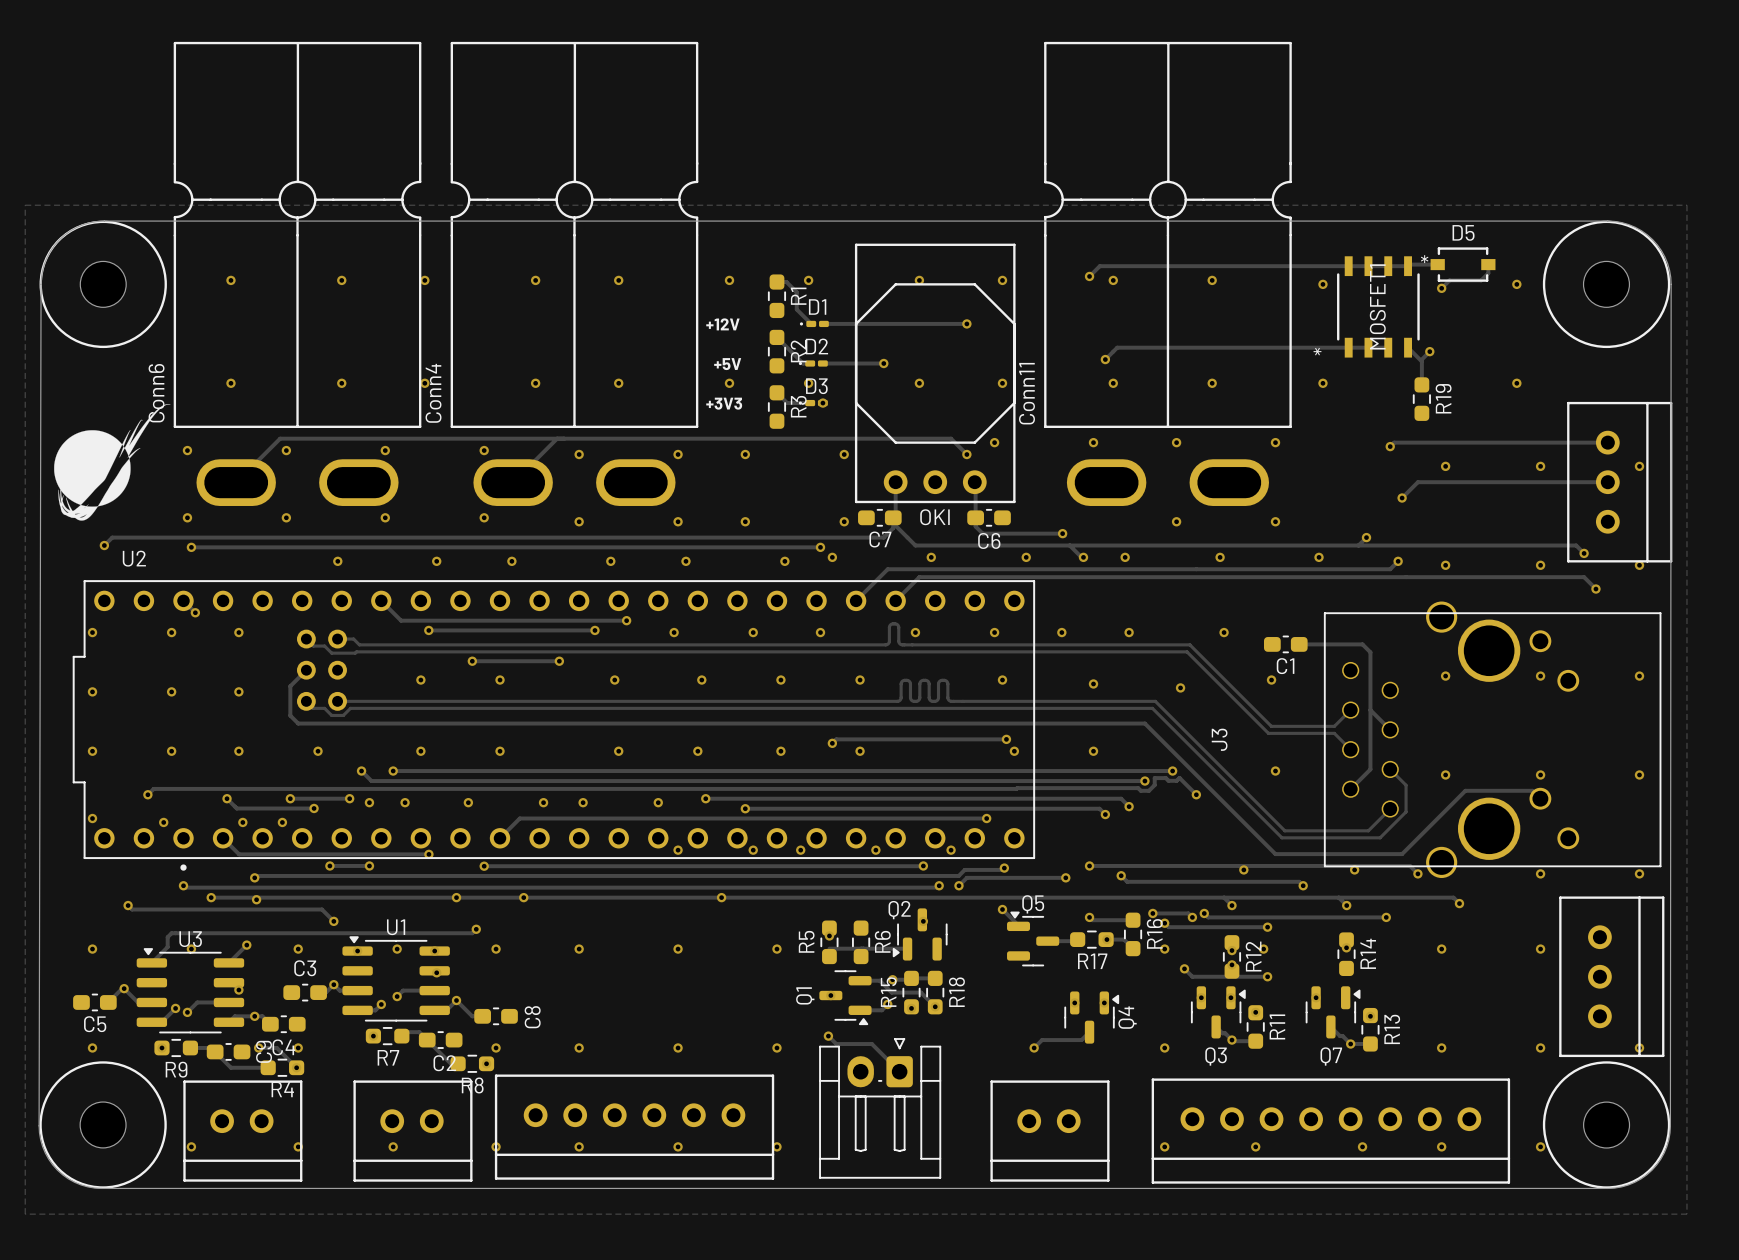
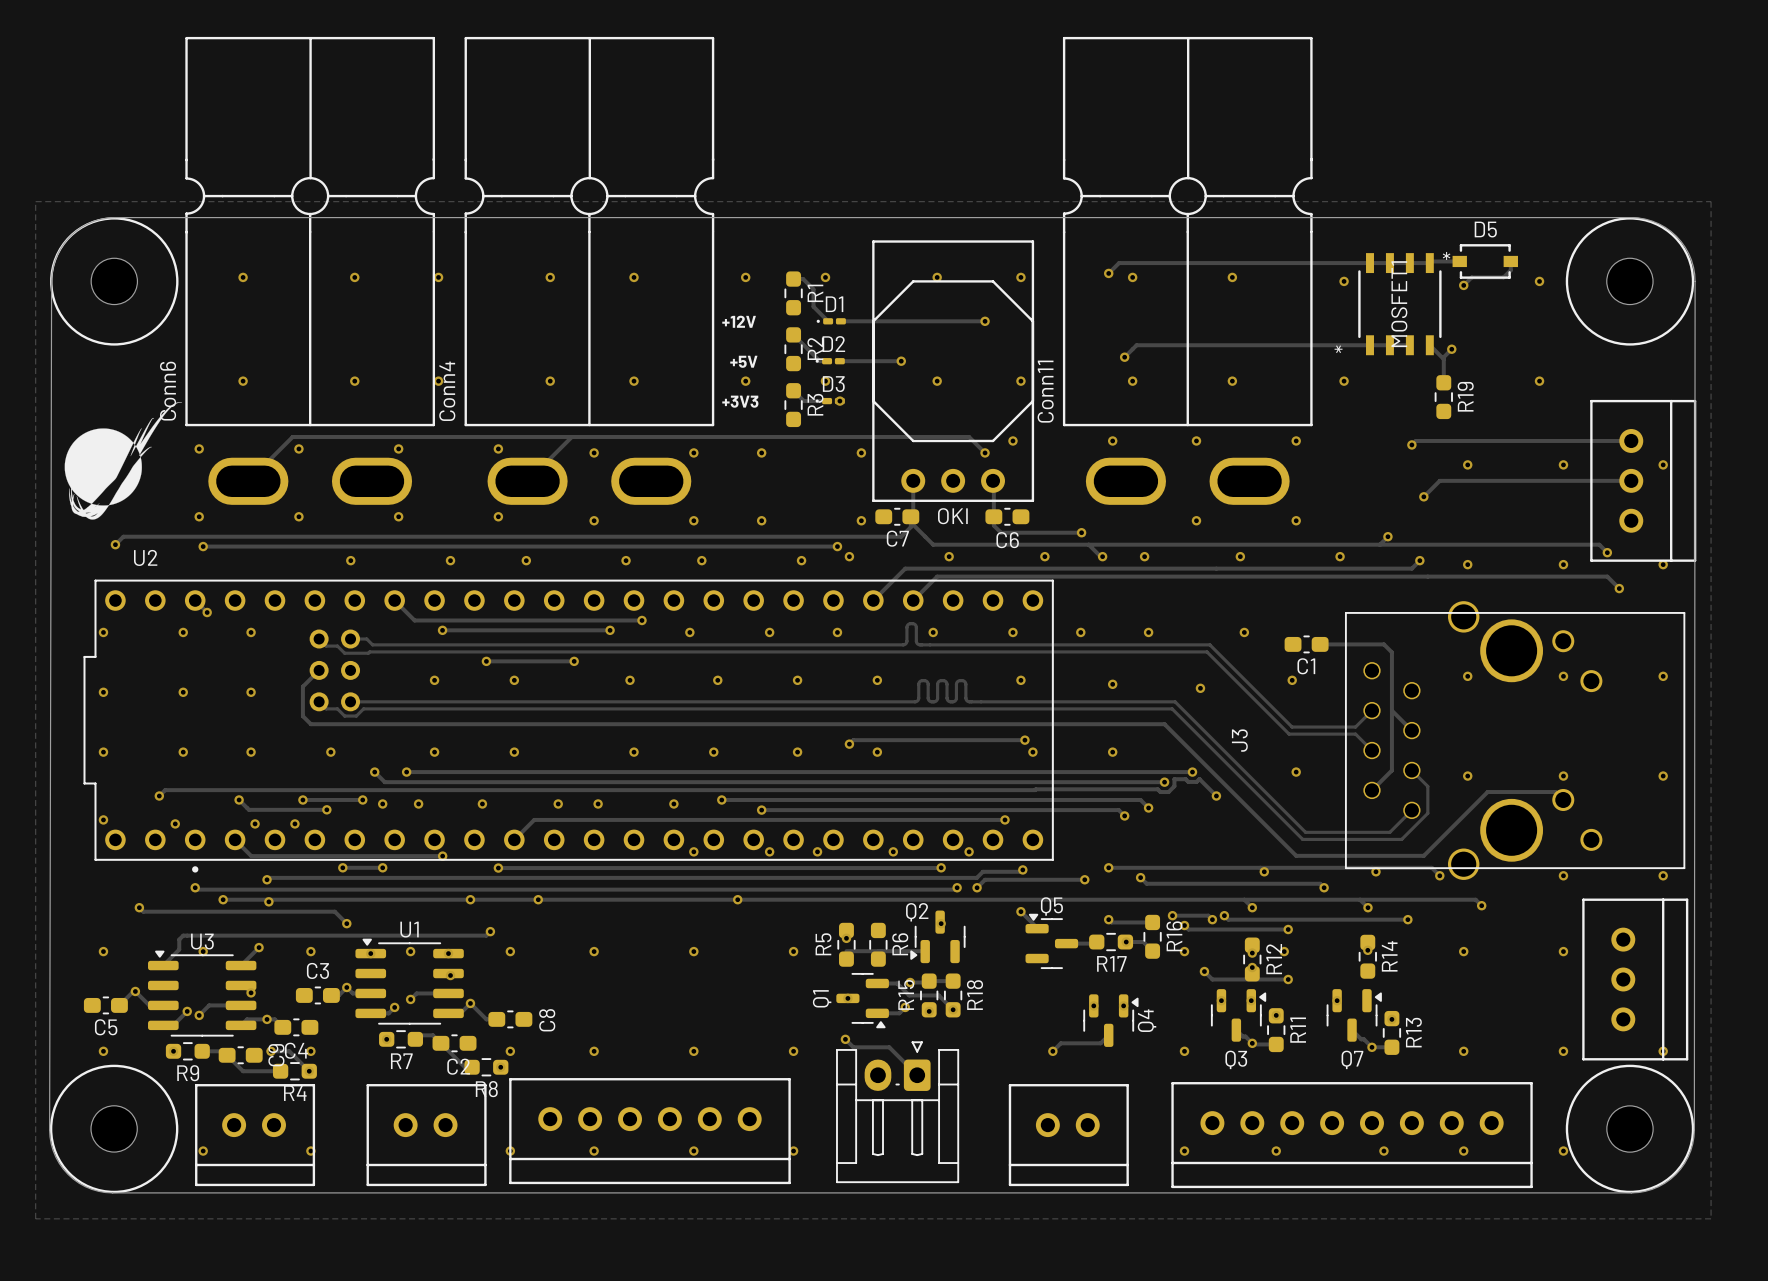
via: (393, 1146) -> none

